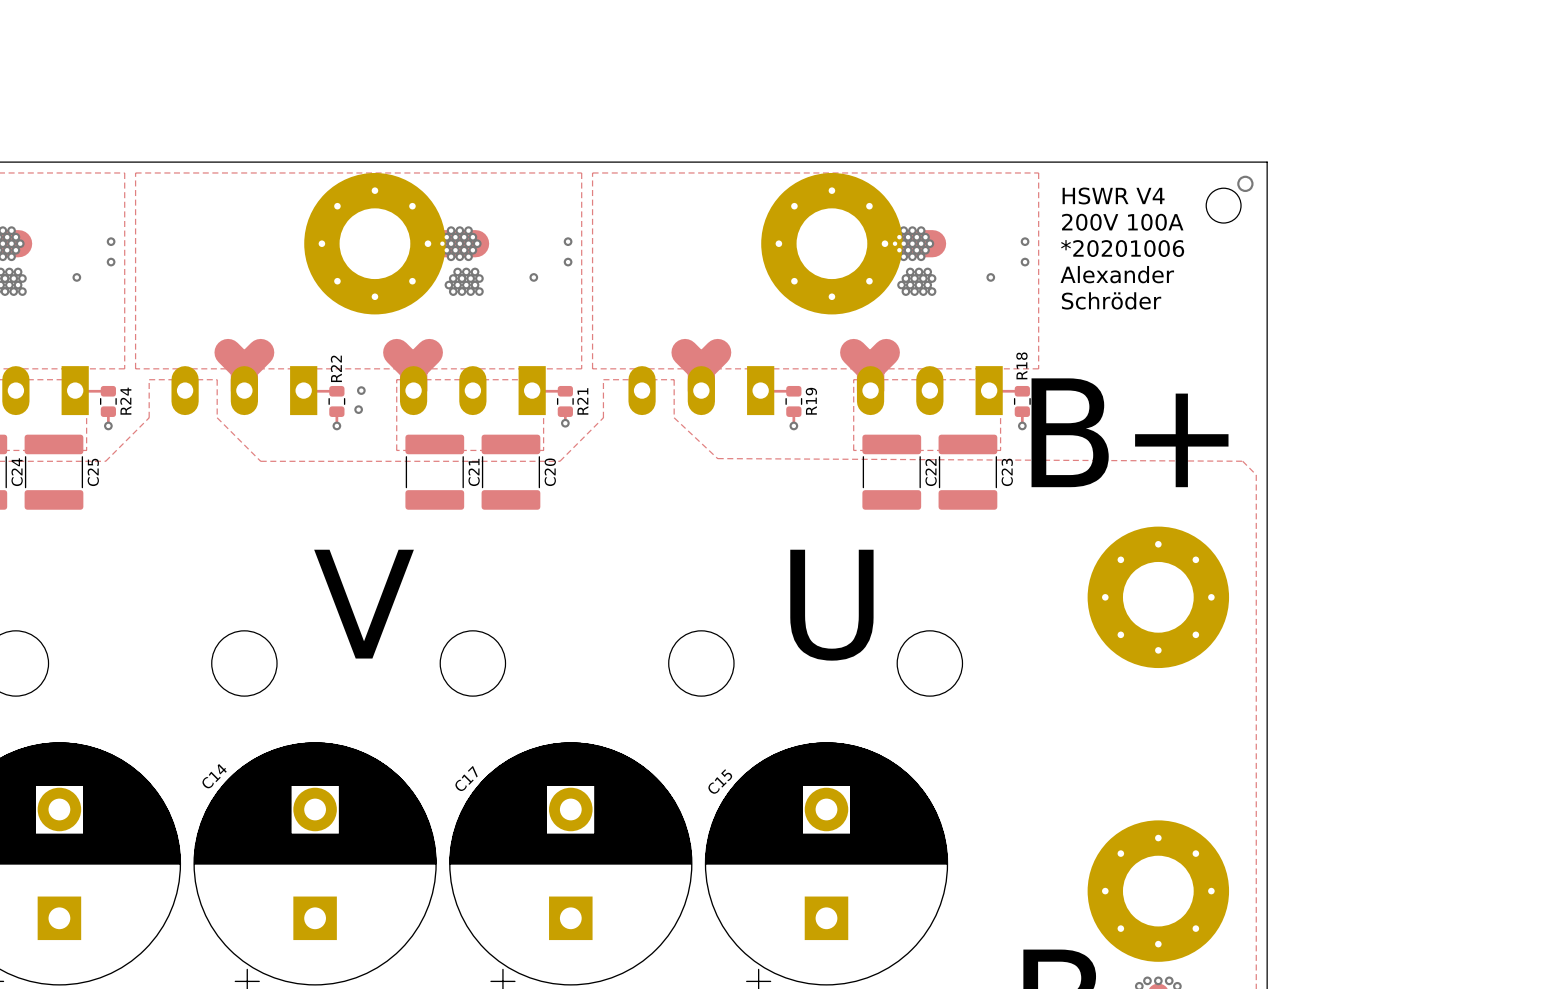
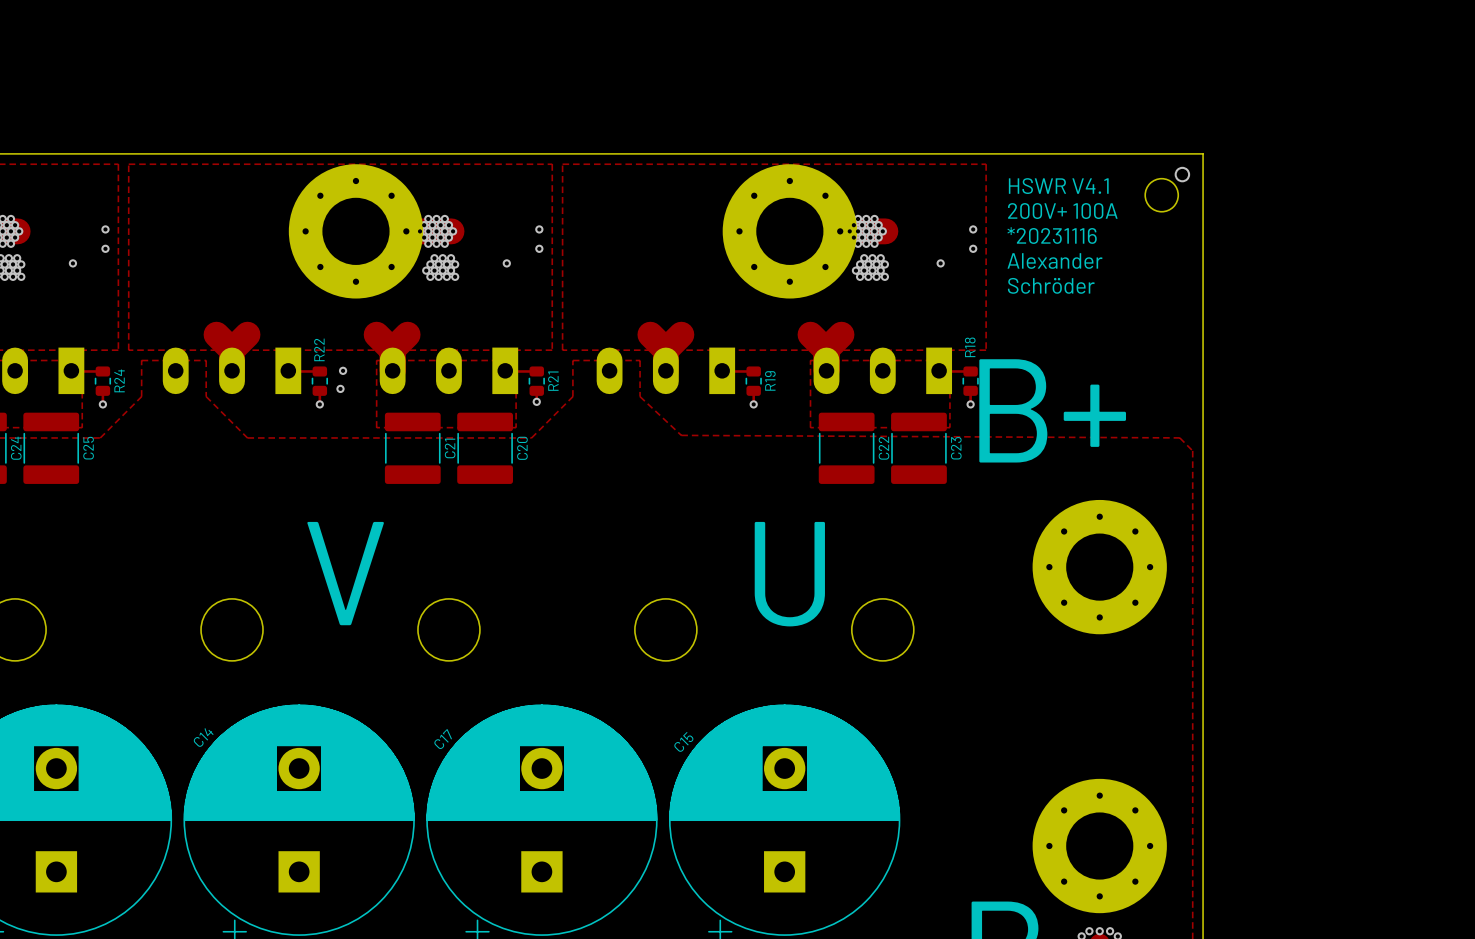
text: HSWR V4 (1113, 195) -> HSWR V4.1 (1058, 186)
text: 200V 100A (1122, 222) -> 200V+ 100A (1062, 211)
text: *20201006 (1122, 248) -> *20231116 (1052, 235)

